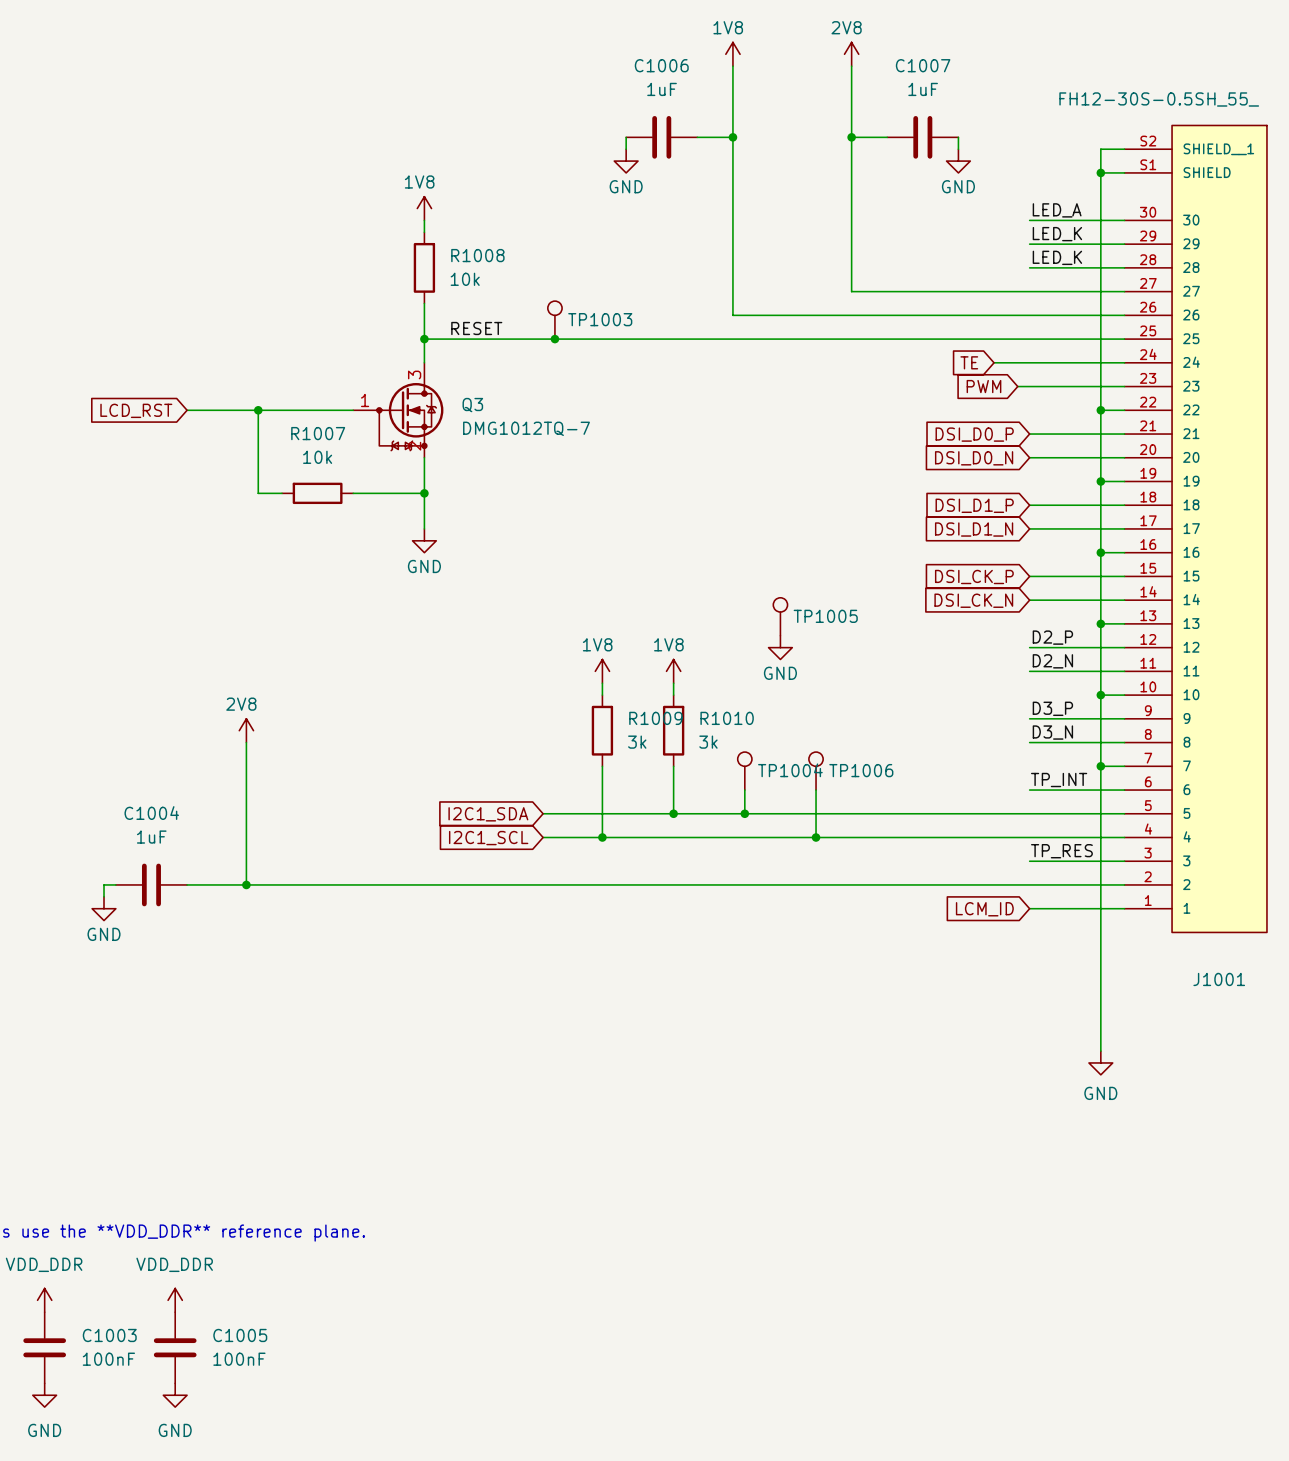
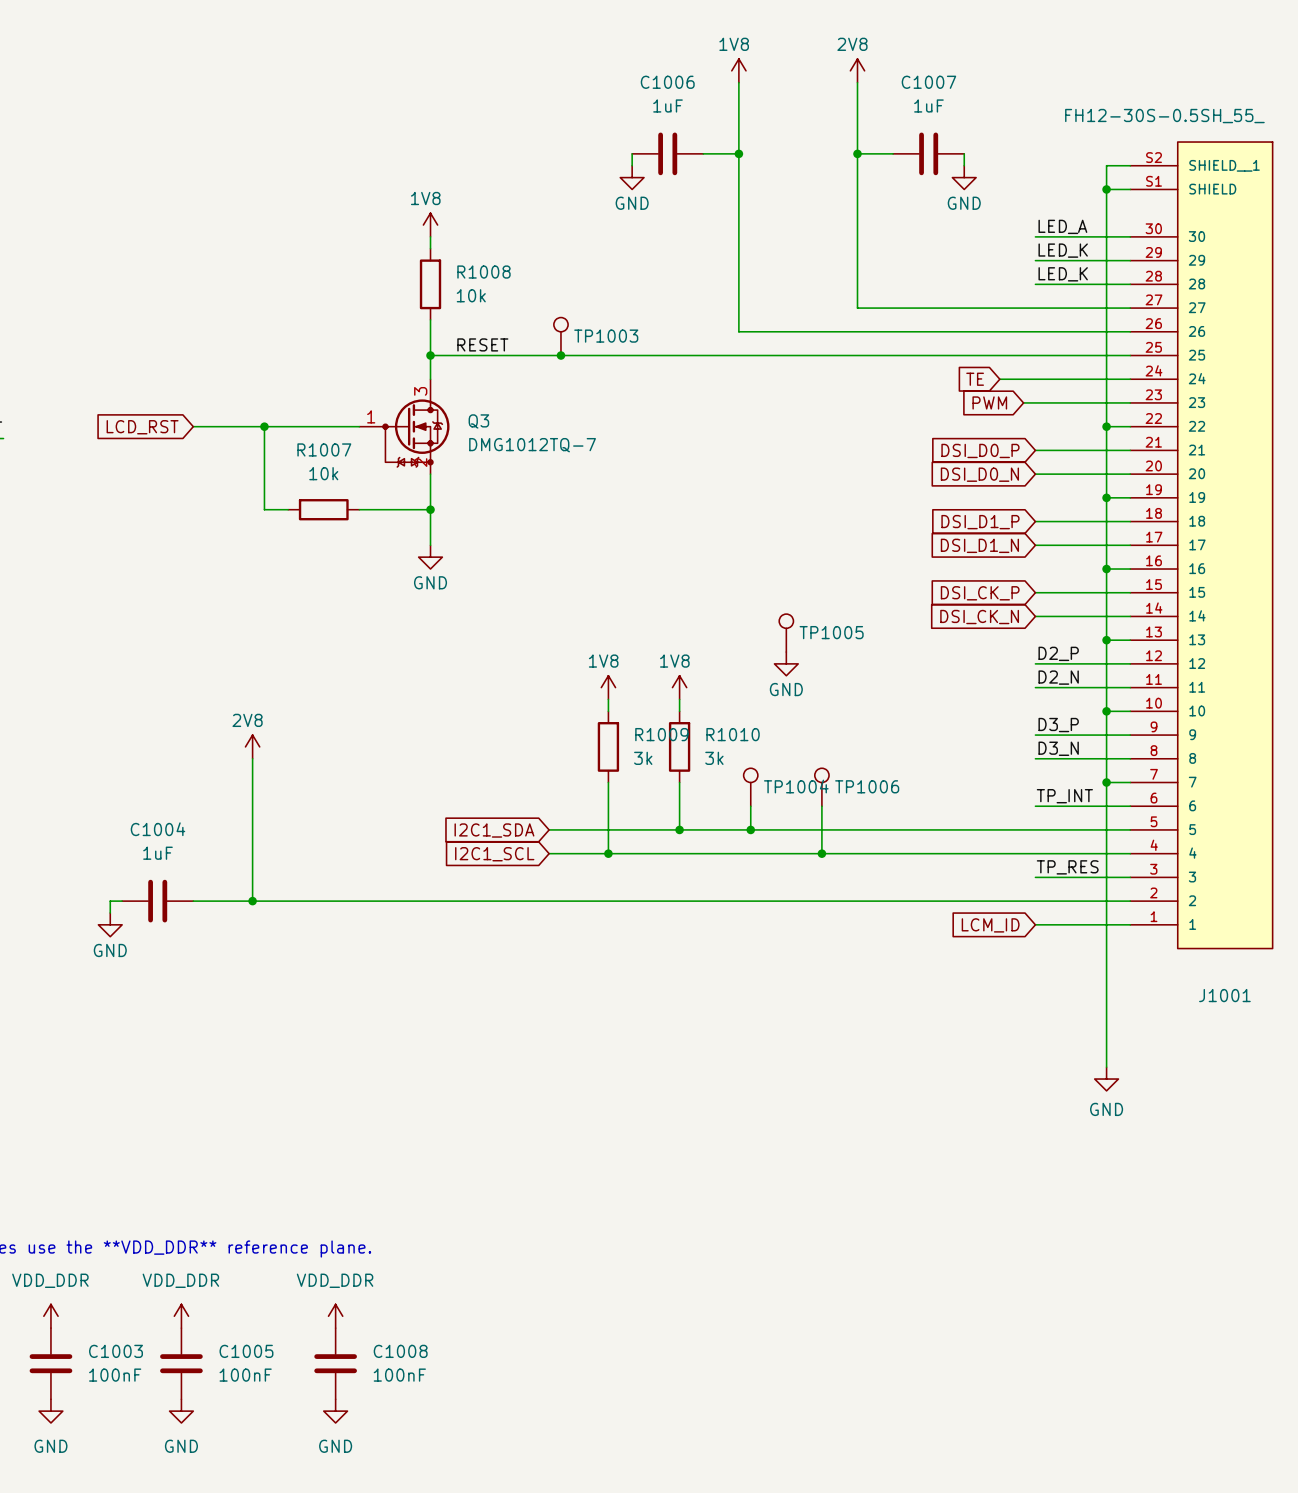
power symbol: none -> VDD_DDR (335, 1316)
C1008: none -> 100nF (335, 1363)
power symbol: none -> GND (335, 1411)

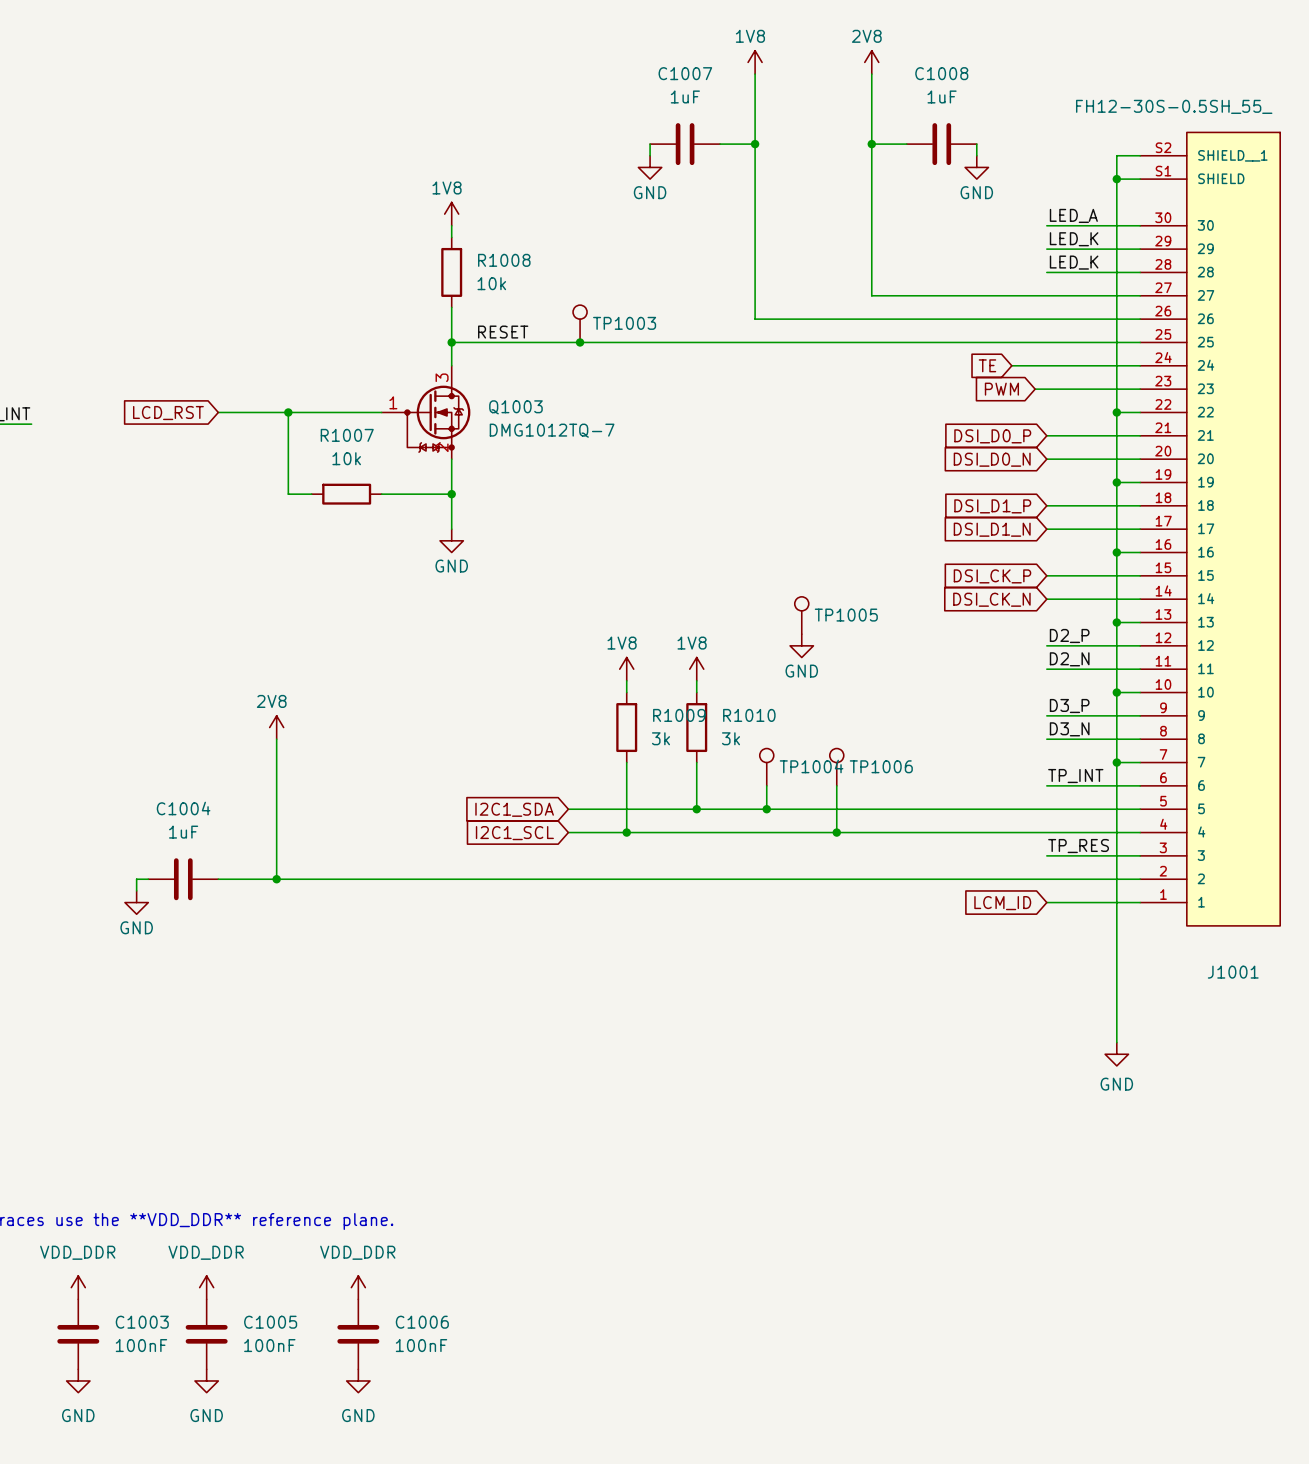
C1006 name: C1006 (667, 82) -> C1007 (685, 73)
C1007 name: C1007 (928, 82) -> C1008 (941, 73)
Q3 name: Q3 (478, 421) -> Q1003 (515, 407)
C1008 name: C1008 (400, 1351) -> C1006 (422, 1322)

